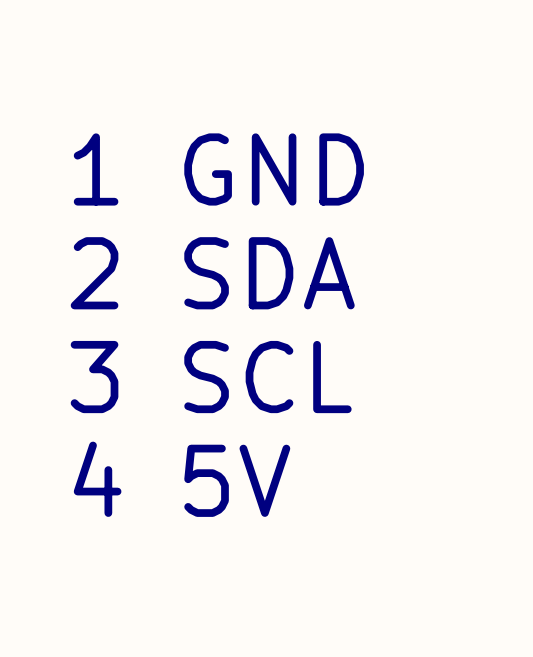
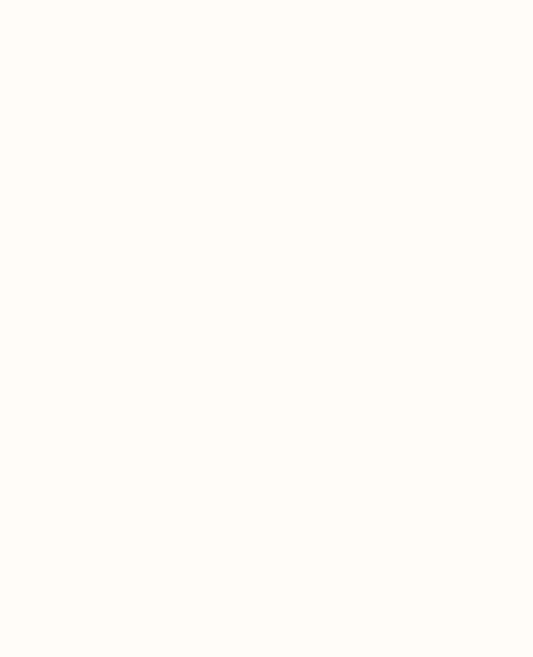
text: 1 GND (218, 169) -> none
text: 2 SDA (212, 273) -> none
text: 3 SCL (211, 377) -> none
text: 4 5V (182, 479) -> none

